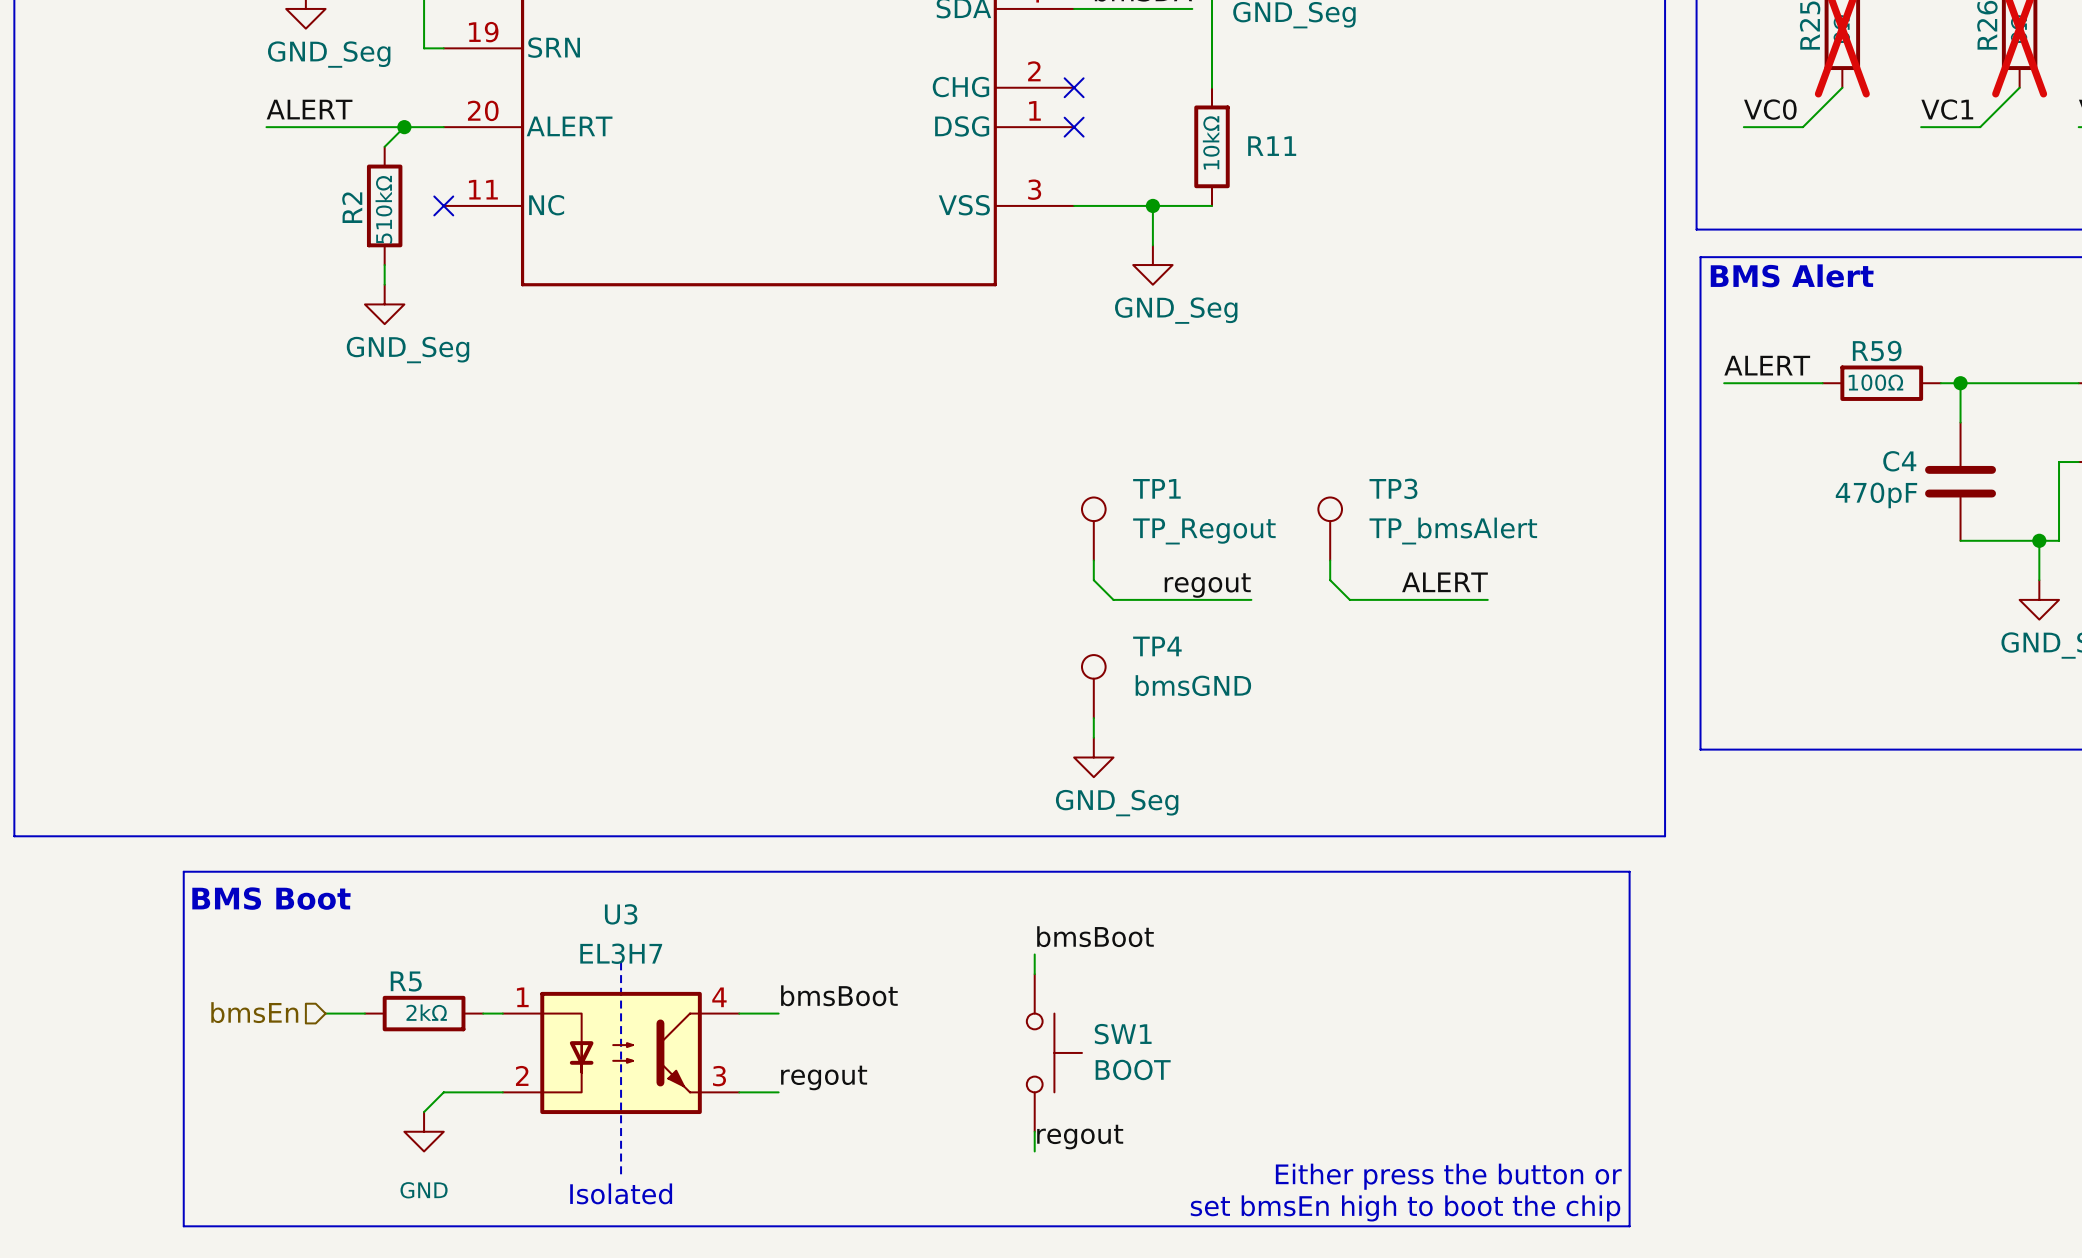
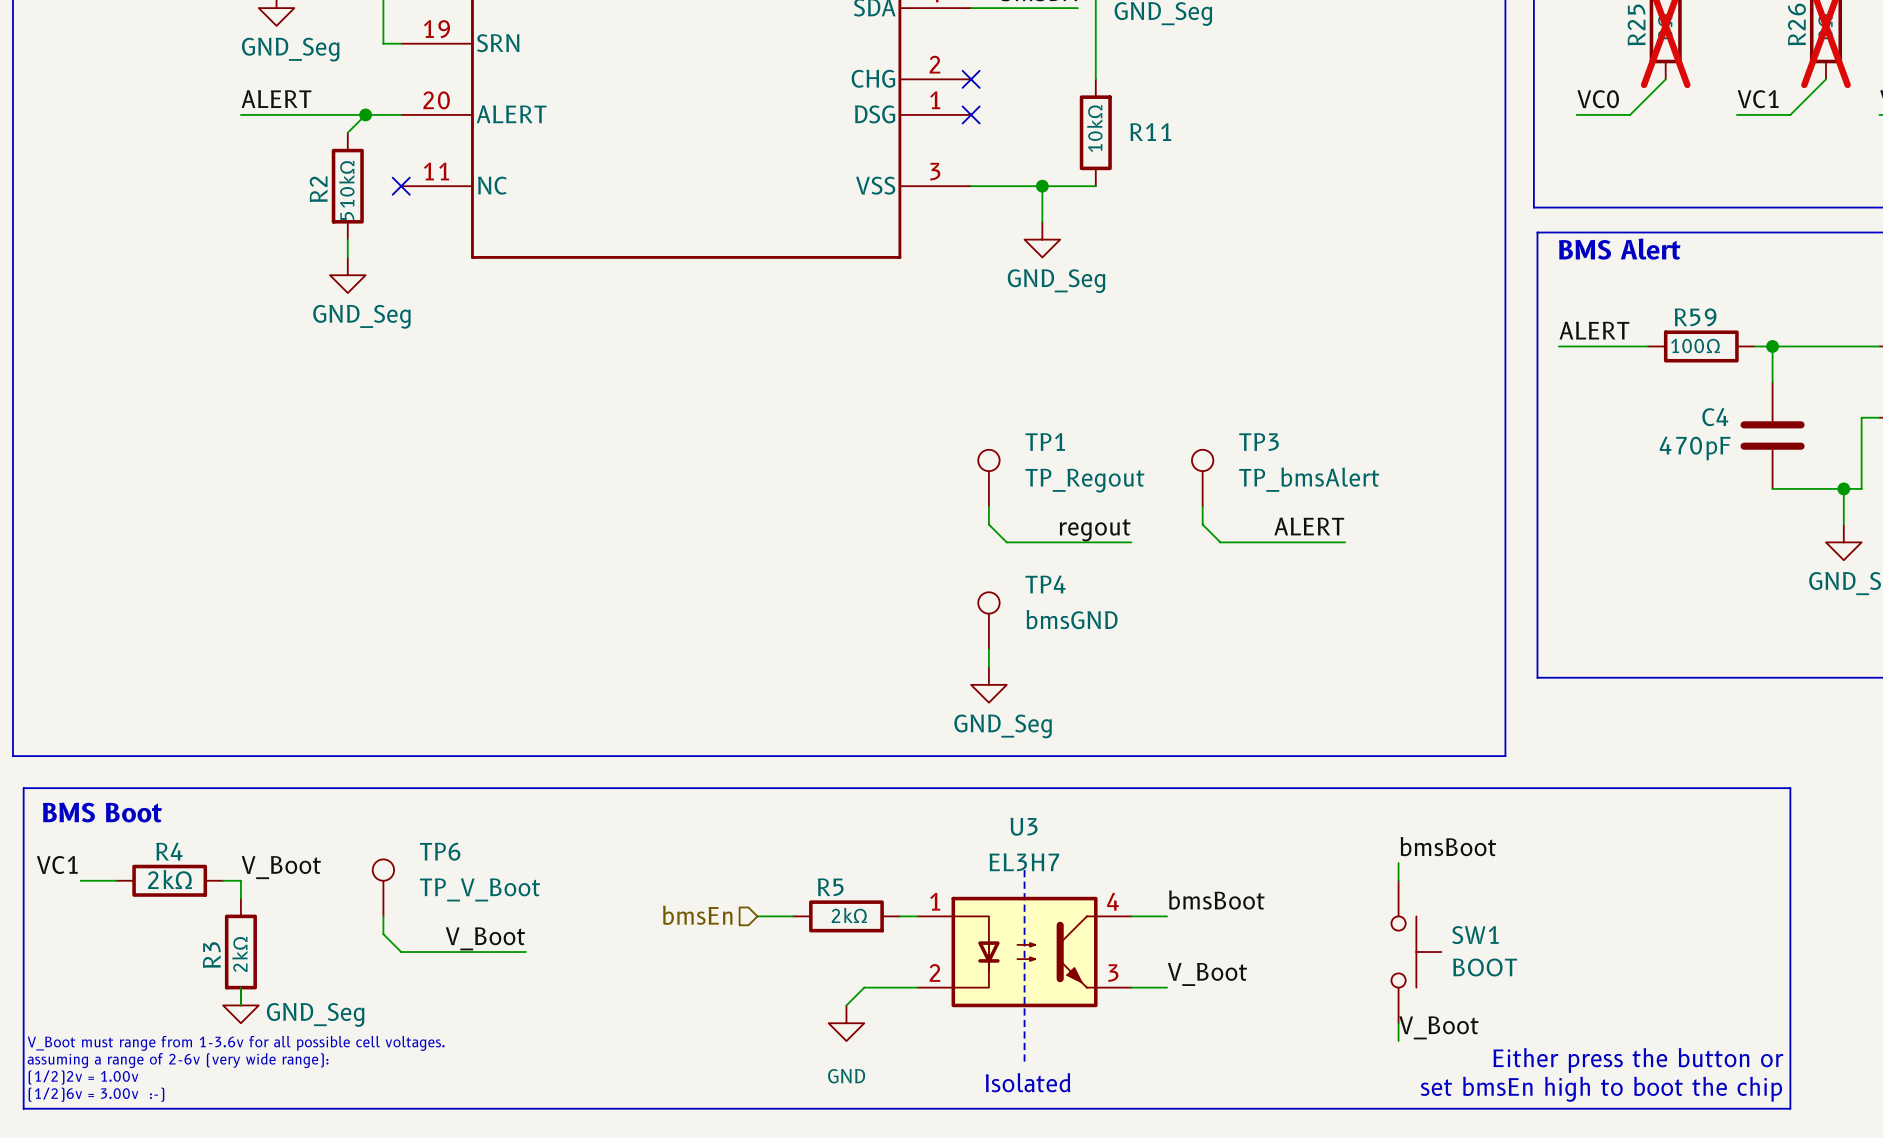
line: (183, 871) (183, 1226) -> (166, 788) (23, 788) (23, 1108) (166, 1108)
line: (1629, 871) (1629, 1226) -> (1473, 788) (1790, 788) (1790, 1108) (1473, 1108)
text position: BMS Boot (271, 898) -> BMS Boot (102, 812)
label: bmsBoot (1095, 936) -> none
label: none -> bmsBoot (1448, 846)
wire: (1034, 954) (1034, 974) -> none
wire: none -> (1398, 862) (1398, 880)
label: none -> VC1 (57, 864)
label: none -> V_Boot (281, 867)
line: (621, 962) (621, 1175) -> none
line: none -> (1024, 870) (1024, 1062)
R4: none -> 2kΩ (169, 880)
wire: none -> (223, 880) (240, 880) (240, 898)
TP6: none -> TP_V_Boot (383, 887)
label: bmsBoot (839, 995) -> none
label: none -> bmsBoot (1216, 900)
hierarchical label: bmsEn (254, 1012) -> none
hierarchical label: none -> bmsEn (697, 915)
wire: (325, 1013) (364, 1013) -> (80, 880) (116, 880)
wire: none -> (383, 916) (383, 934) (401, 952) (525, 952)
R5 position: (424, 1013) -> (846, 916)
wire: (483, 1013) (502, 1013) -> none
wire: (739, 1013) (778, 1013) -> (757, 916) (793, 916)
wire: none -> (899, 916) (917, 916)
wire: none -> (1131, 916) (1167, 916)
label: none -> V_Boot (485, 938)
R3: none -> 2kΩ (240, 952)
U3 position: (621, 1052) -> (1024, 952)
SW1 position: (1054, 1052) -> (1416, 952)
label: regout (824, 1077) -> none
label: none -> V_Boot (1207, 974)
wire: none -> (240, 987) (240, 1005)
wire: (502, 1092) (443, 1092) (424, 1112) -> none
wire: (739, 1092) (778, 1092) -> none
wire: none -> (917, 987) (864, 987) (846, 1005)
wire: none -> (1131, 987) (1167, 987)
power symbol: none -> GND_Seg (240, 1005)
power symbol: GND (424, 1131) -> none
power symbol: none -> GND (846, 1023)
wire: (1034, 1131) (1034, 1151) -> none
wire: none -> (1398, 1023) (1398, 1041)
label: regout (1080, 1137) -> none
label: none -> V_Boot (1438, 1027)
text: none -> V_Boot must range from 1-3.6v for all possible cell voltages. (236, 1043)
text: none -> assuming a range of 2-6v (very wide range): (178, 1060)
text position: Either press the button or (1448, 1176) -> Either press the button or (1638, 1060)
text: none -> (1/2)2v = 1.00v (83, 1077)
text: Isolated (621, 1193) -> none
text: none -> Isolated (1028, 1082)
text position: set bmsEn high to boot the chip (1405, 1208) -> set bmsEn high to boot the chip (1601, 1089)
text: none -> (1/2)6v = 3.00v :-) (96, 1094)

